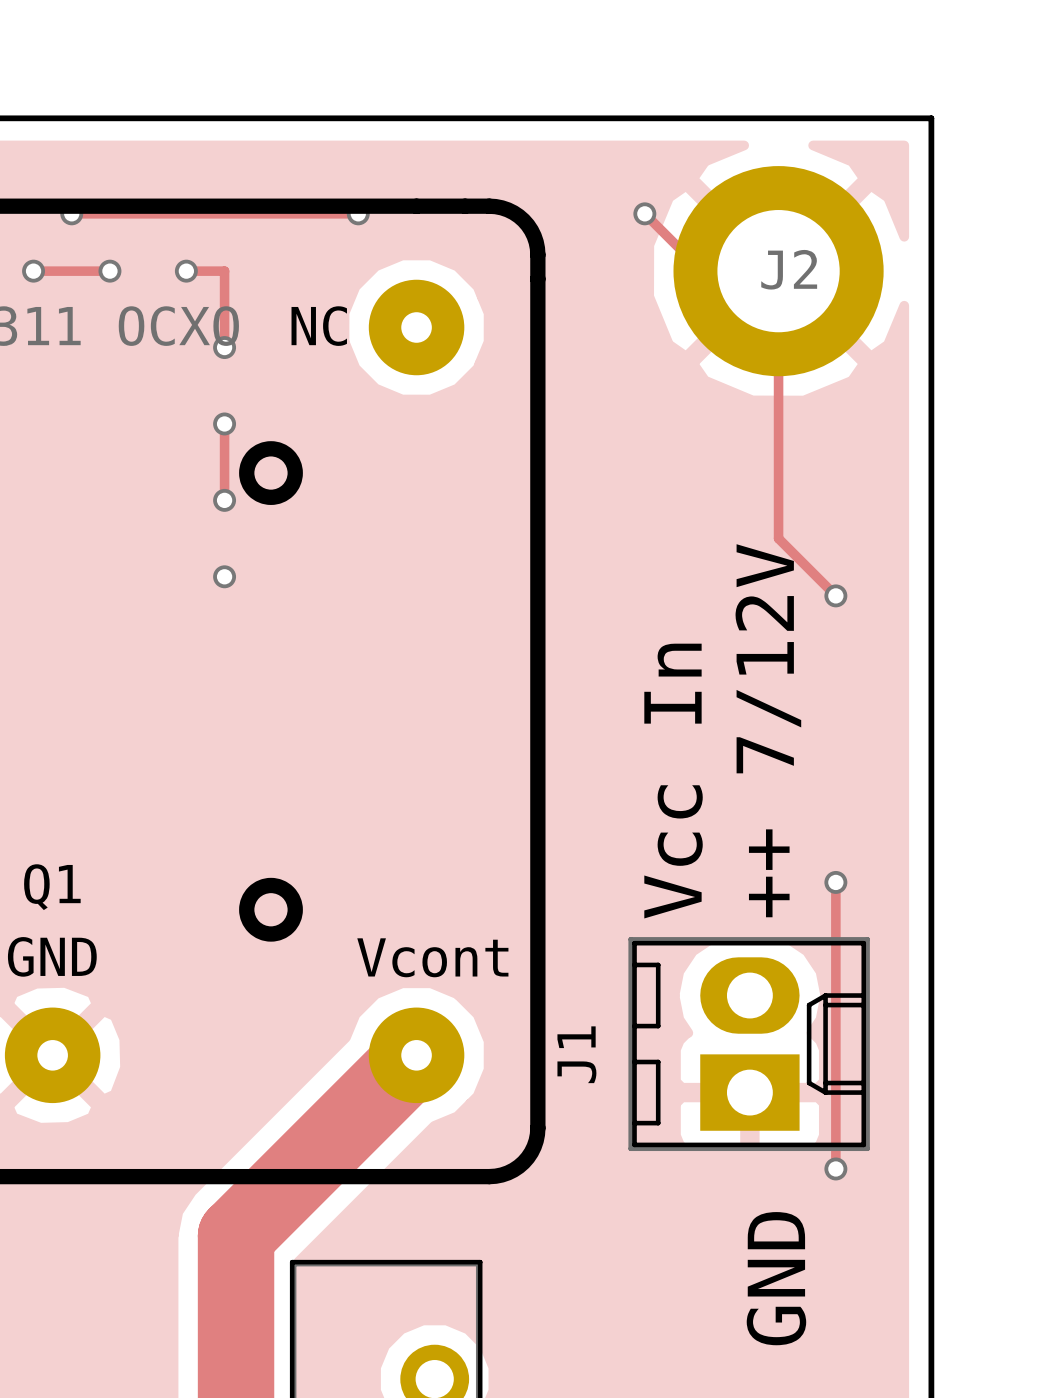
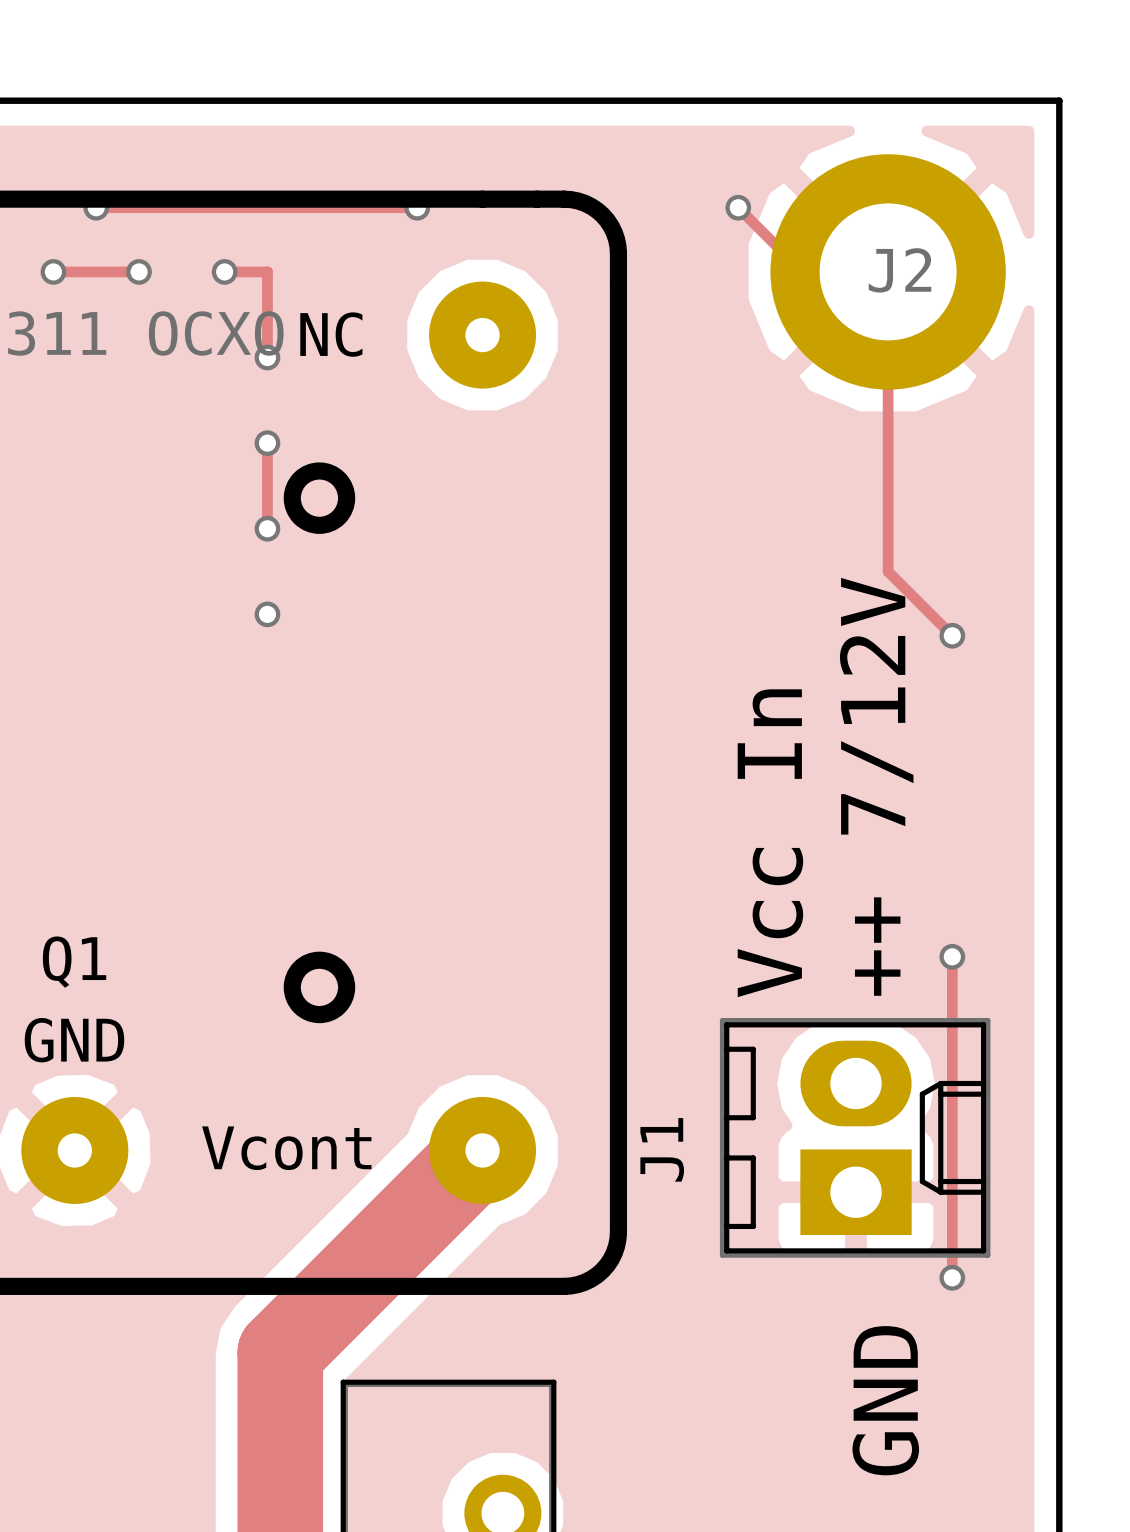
Q1 text position: NC (319, 326) -> NC (331, 334)
Q1 text position: Vcont (432, 957) -> Vcont (286, 1148)

